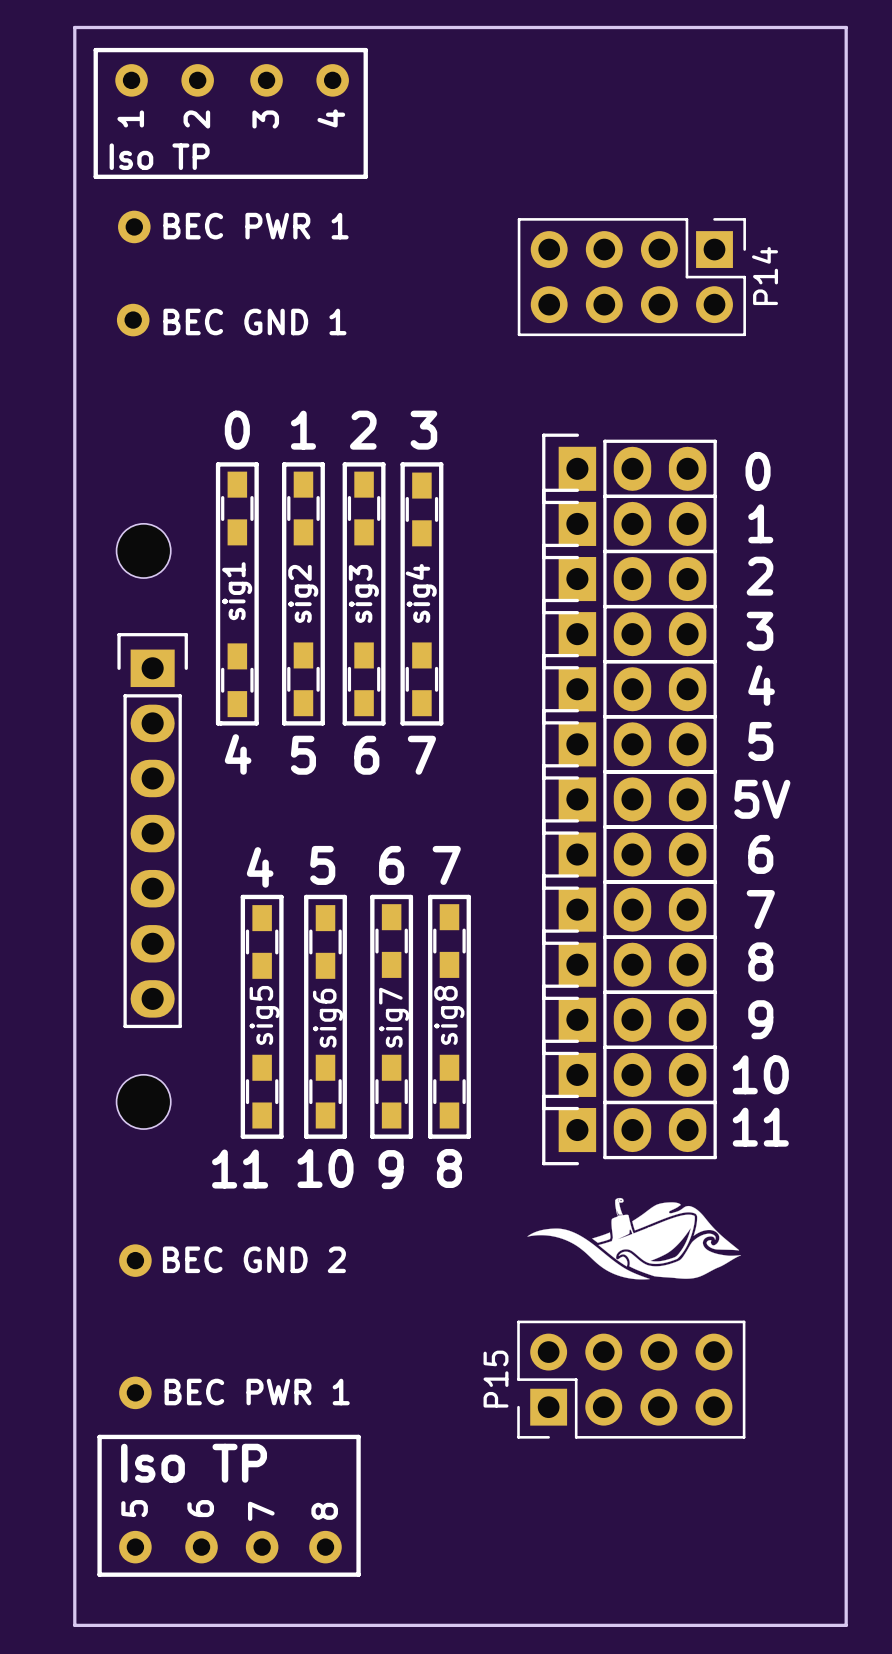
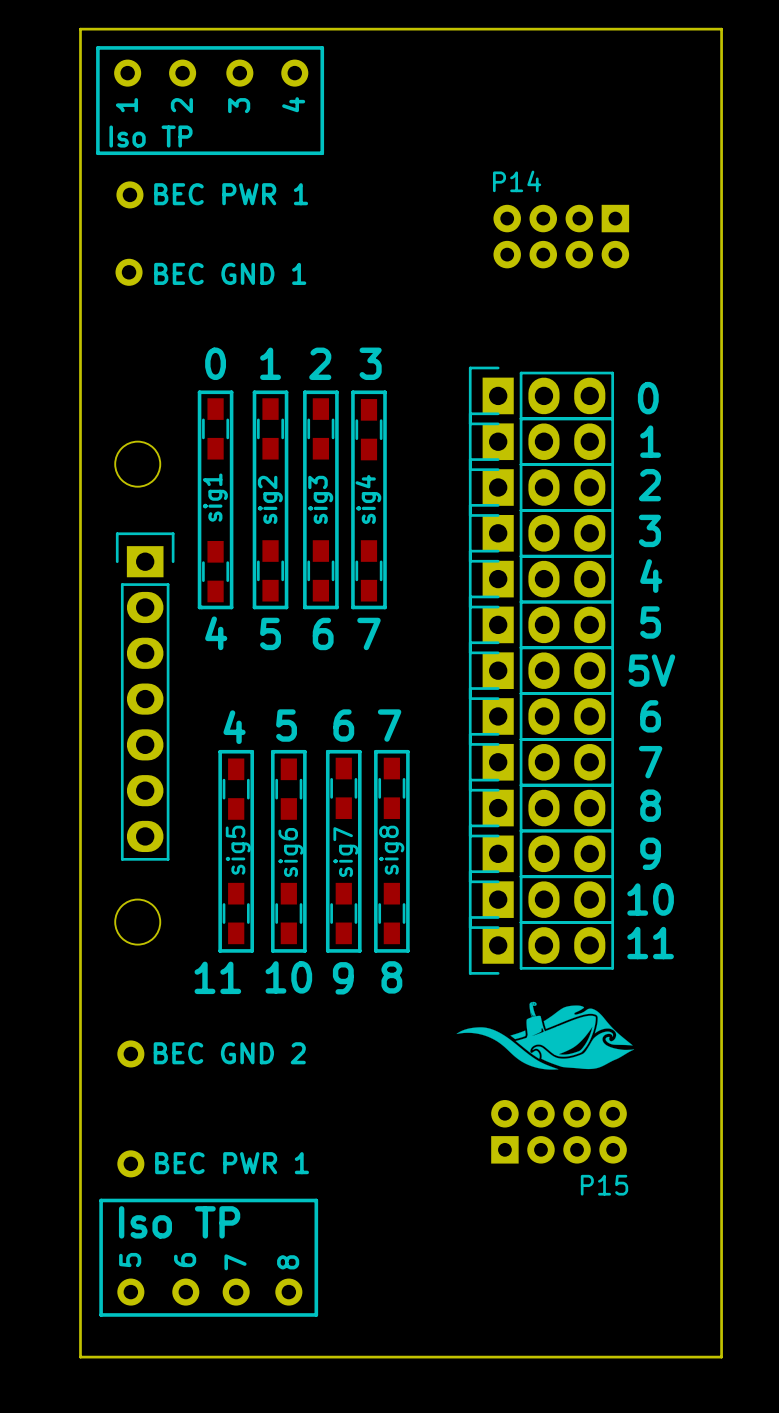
P14 footprint: [517, 218, 746, 337] -> [493, 204, 630, 269]
P14 name position: P14 (765, 276) -> P14 (517, 181)
P15 footprint: [517, 1320, 746, 1439] -> [491, 1100, 627, 1164]
P15 name position: P15 (495, 1379) -> P15 (604, 1185)

